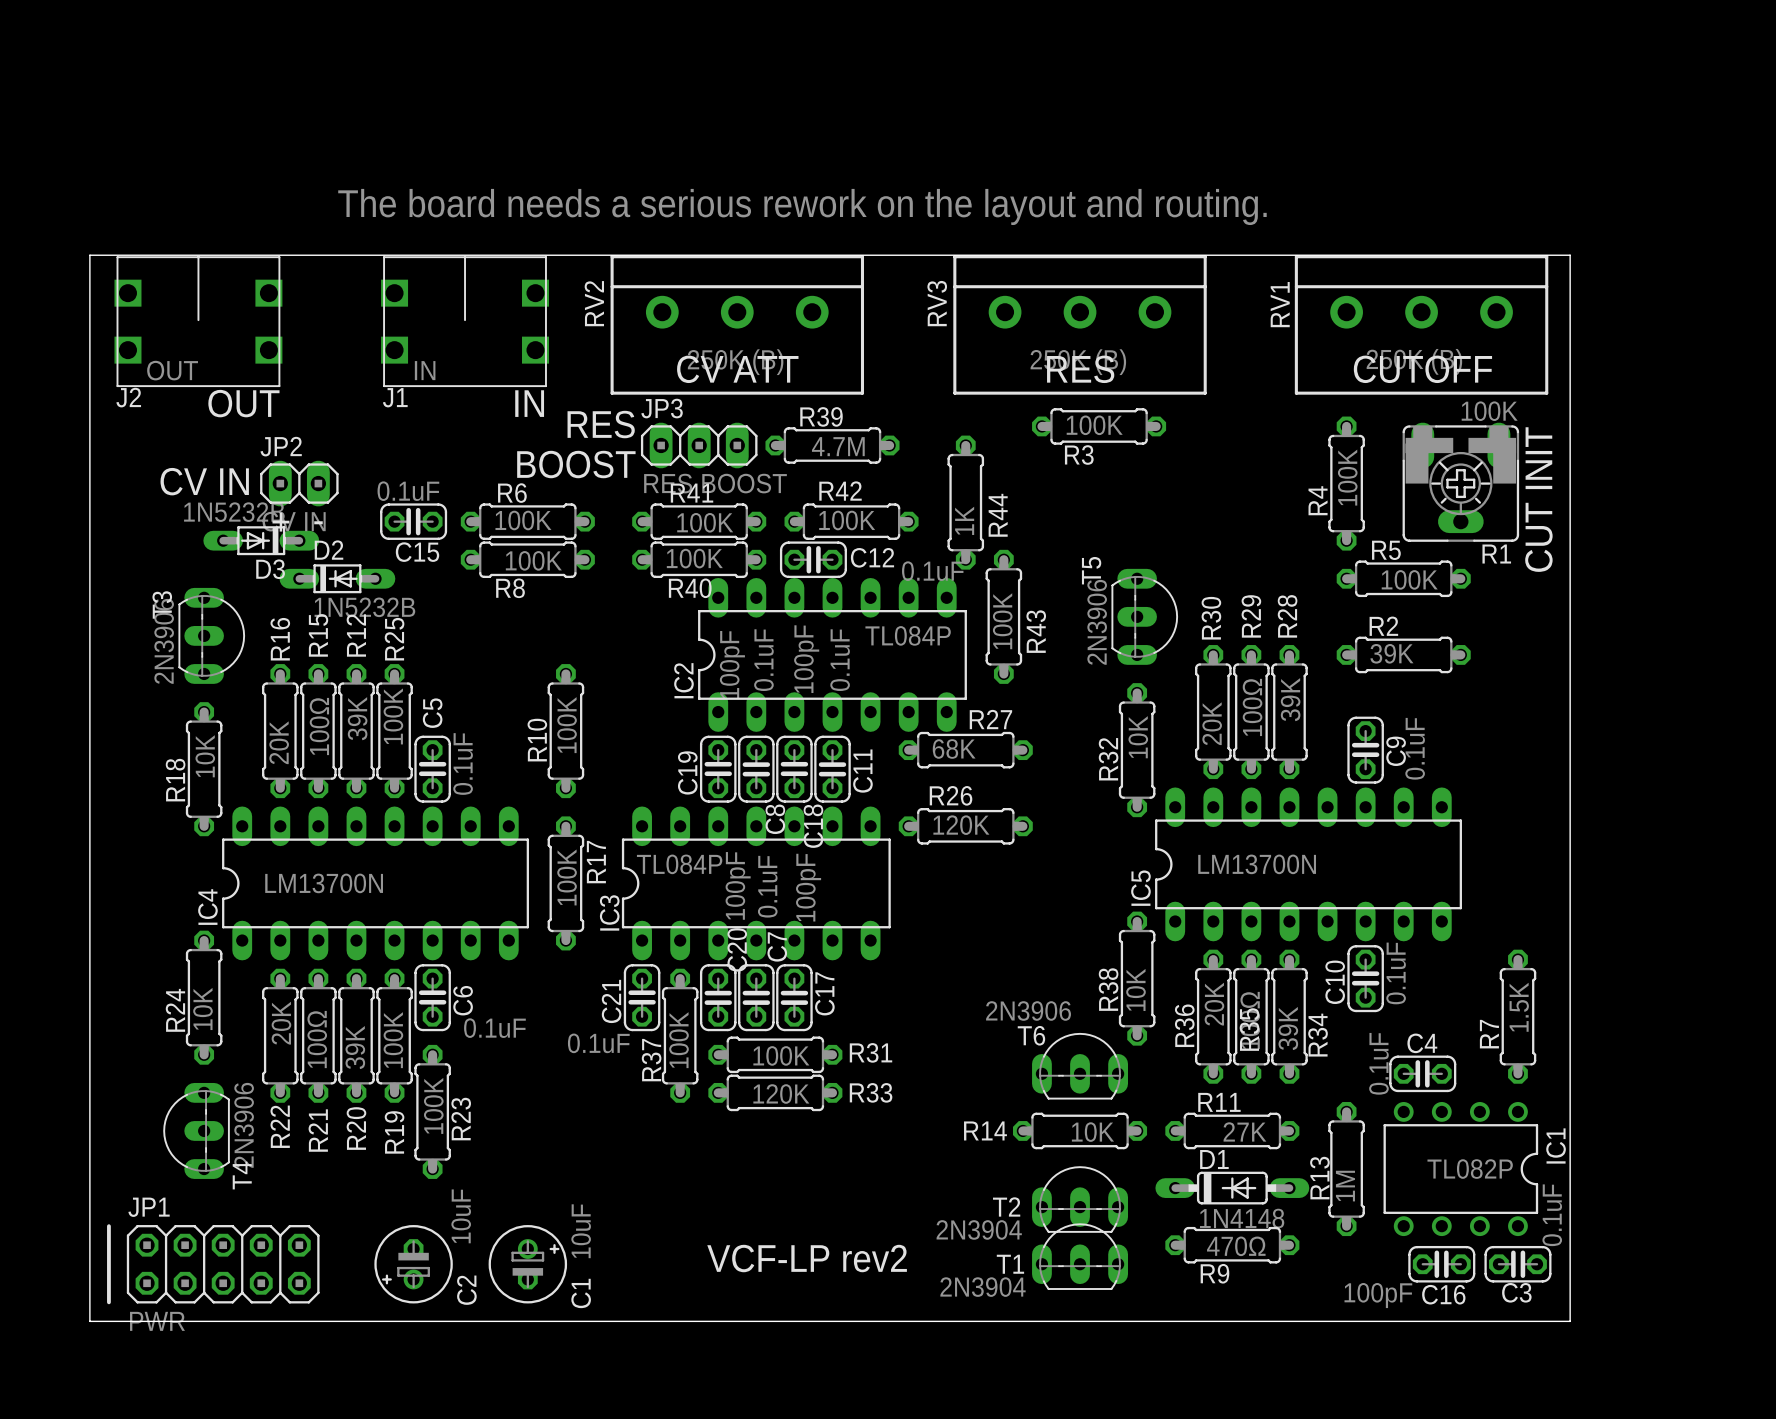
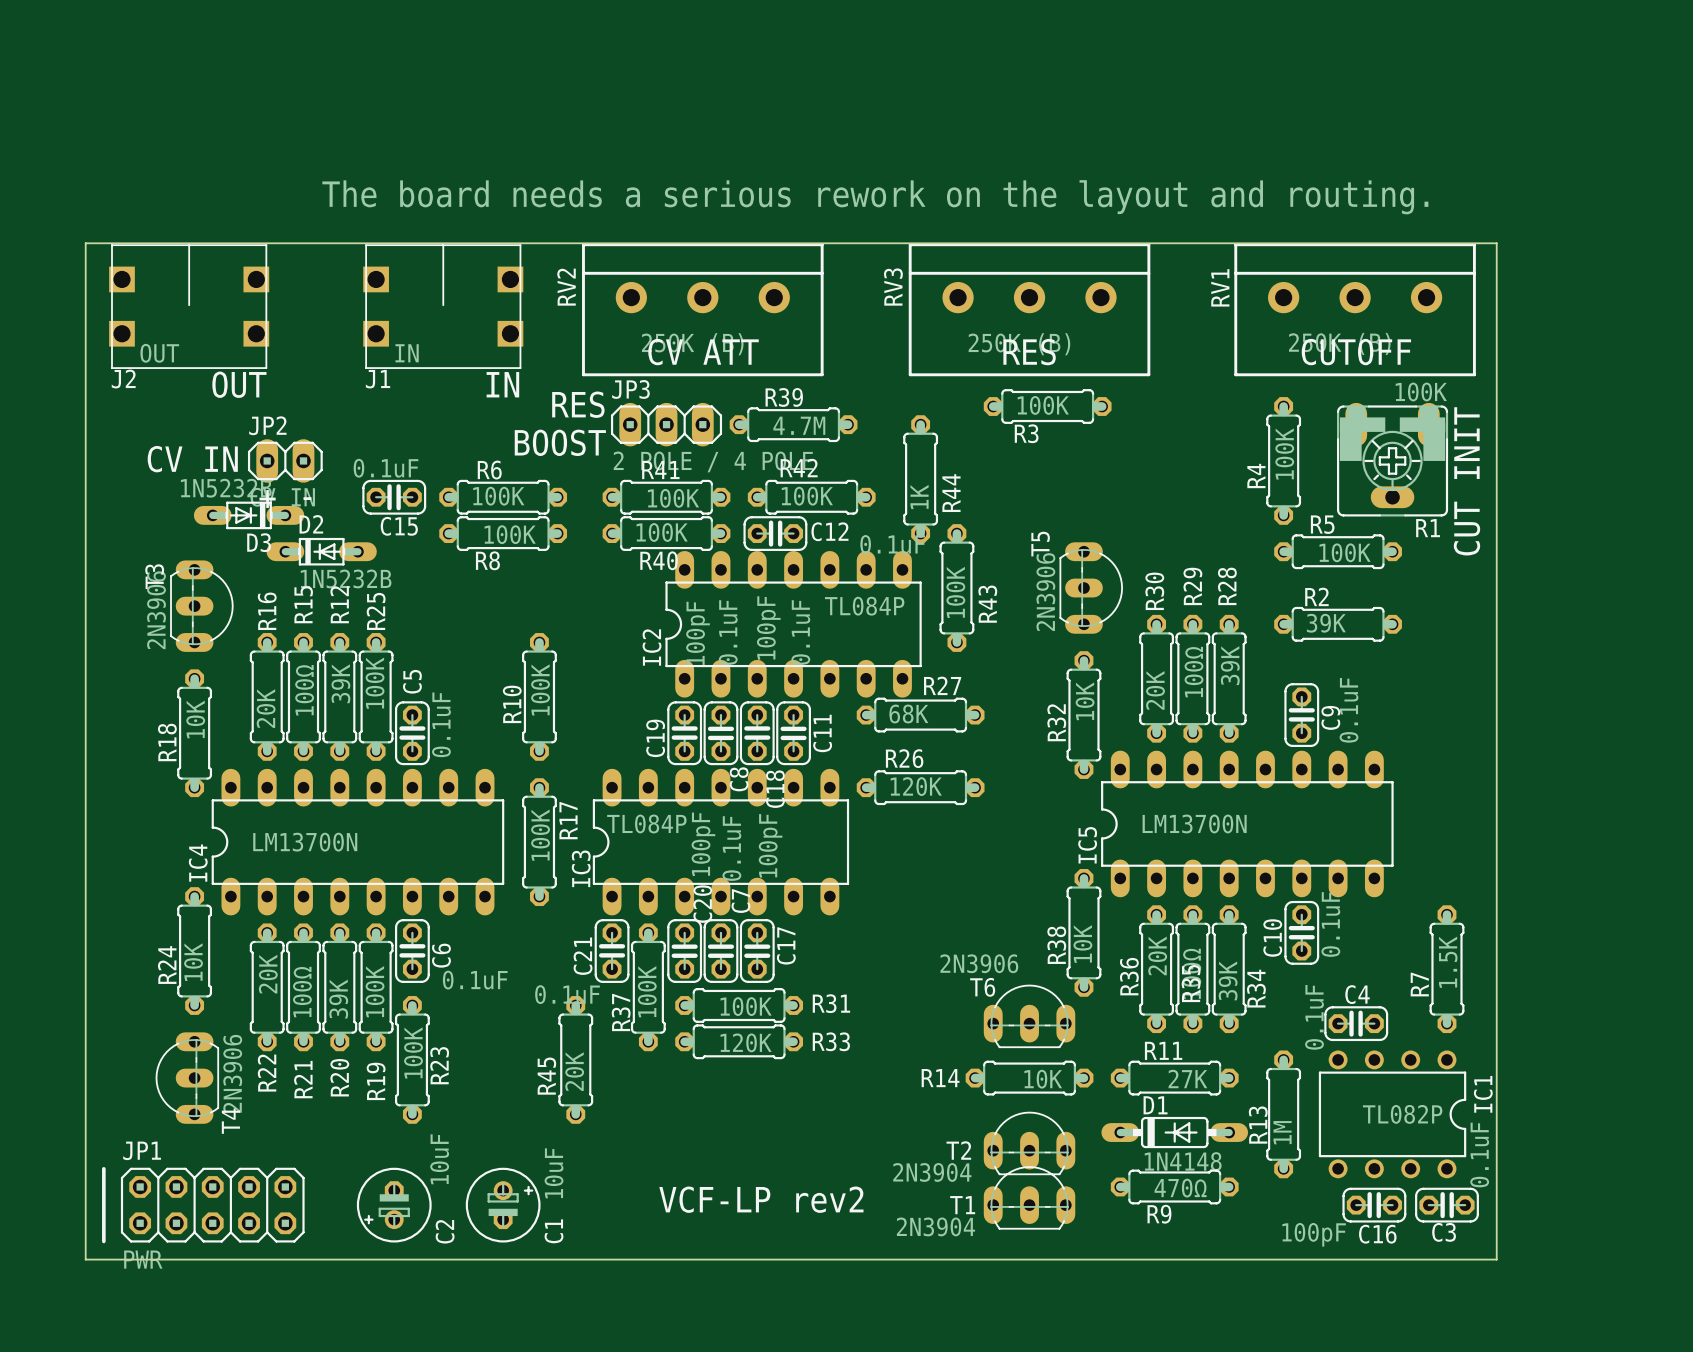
JP3 value: RES BOOST (715, 483) -> 2 POLE / 4 POLE (713, 461)
R45: none -> 20K (575, 1059)

